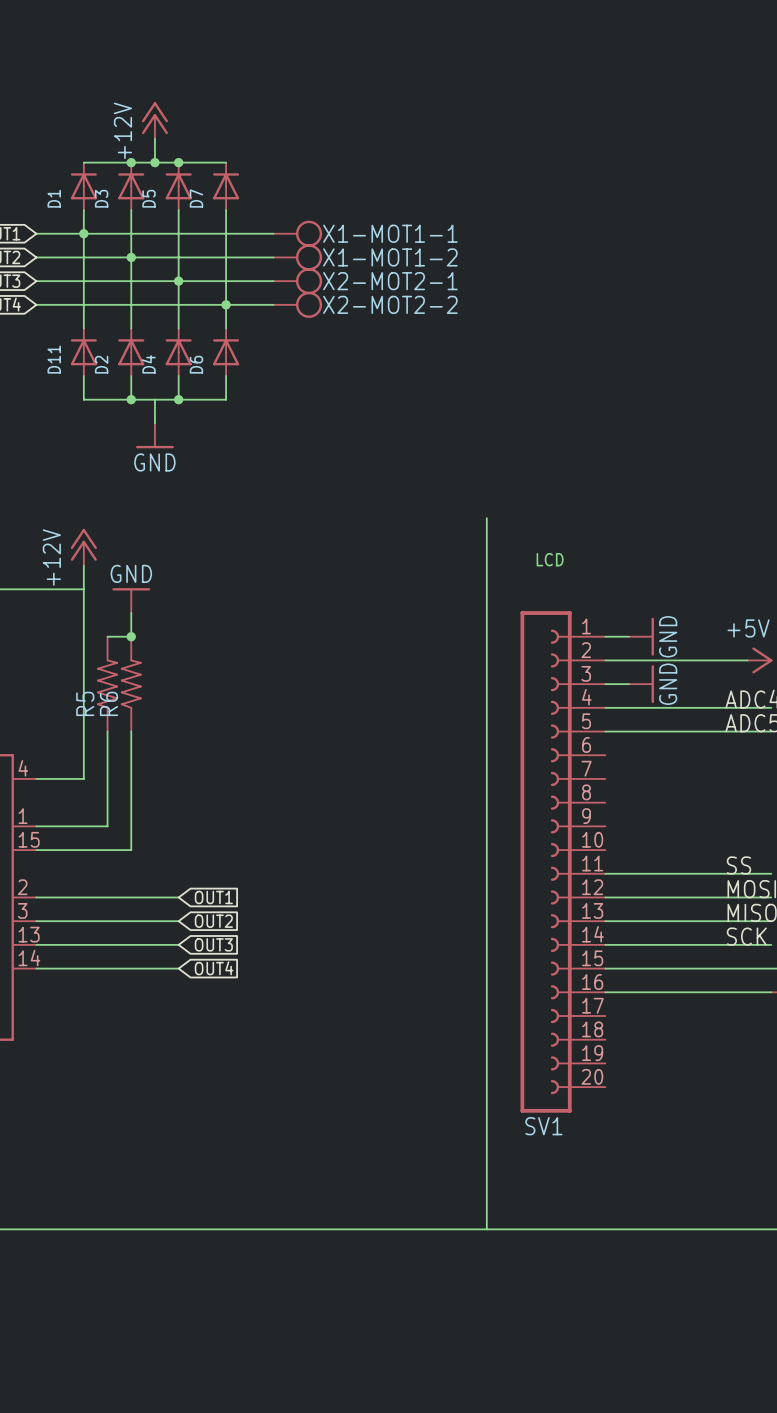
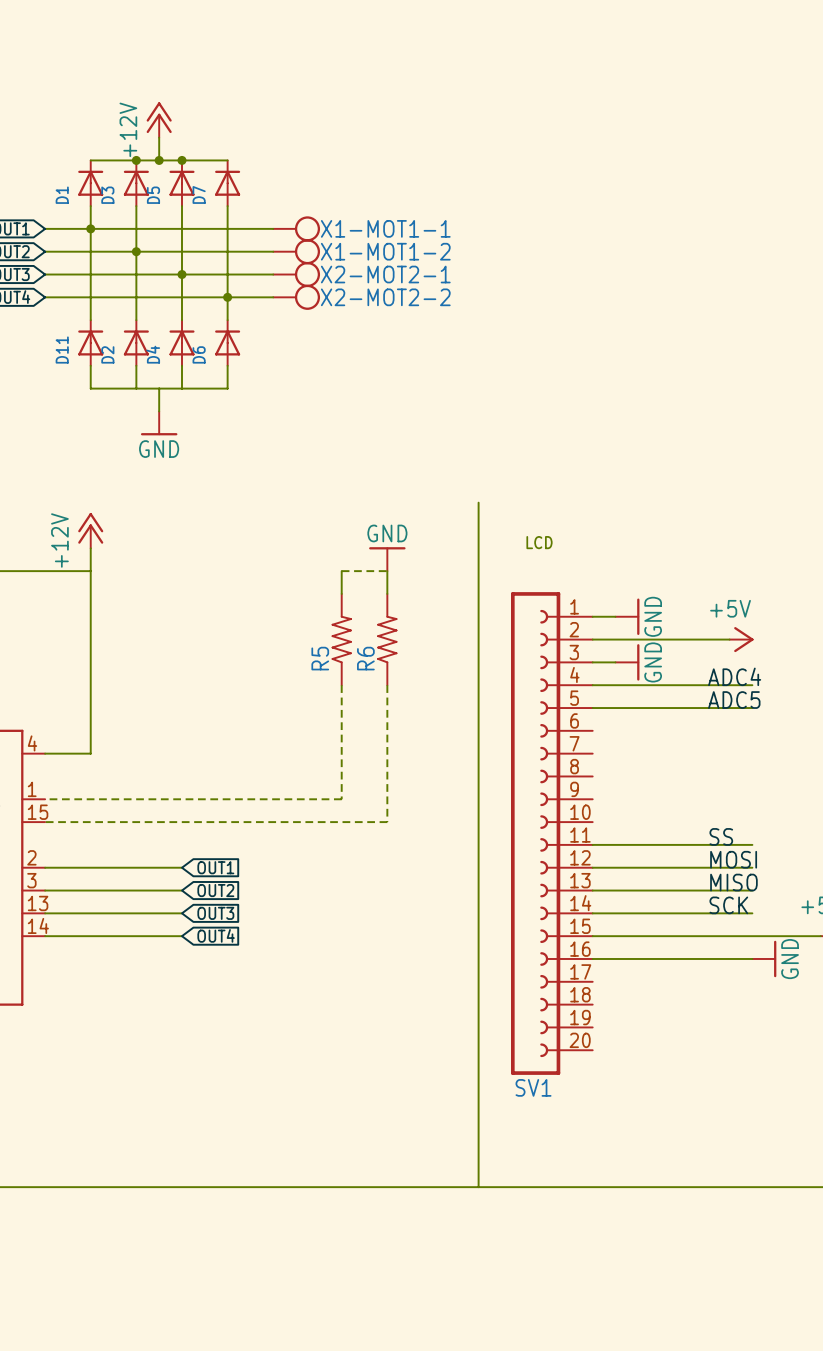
junction: (131, 399) -> none
junction: (178, 399) -> none
power symbol: none -> GND (387, 559)
power symbol: GND (131, 600) -> none
wire: (131, 613) (131, 636) (107, 636) -> none
wire: none -> (341, 593) (341, 571) (387, 571) (387, 593)
junction: (131, 636) -> none
R5 position: (107, 684) -> (341, 639)
R6 position: (131, 684) -> (387, 639)
wire: (107, 731) (107, 826) (36, 826) -> (341, 685) (341, 799) (45, 799)
wire: (131, 731) (131, 850) (36, 850) -> (387, 685) (387, 822) (45, 822)

